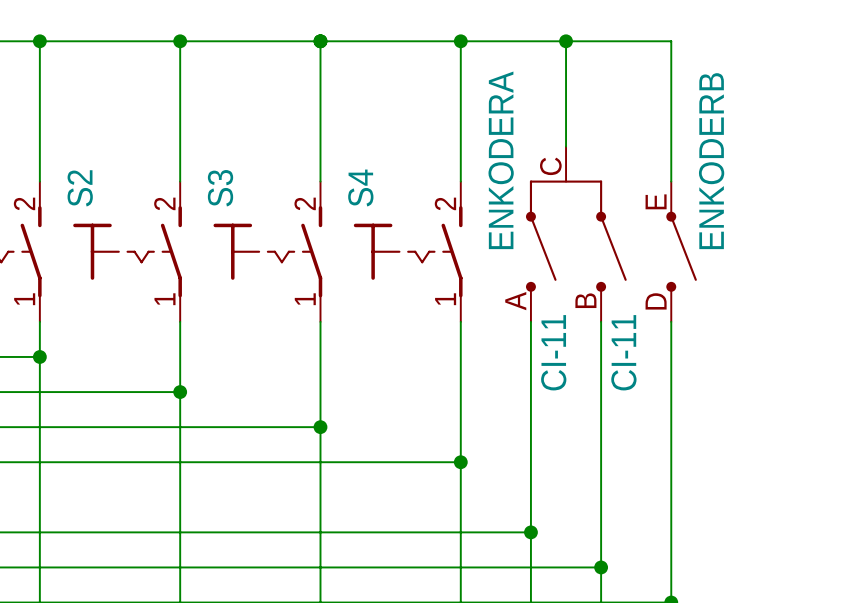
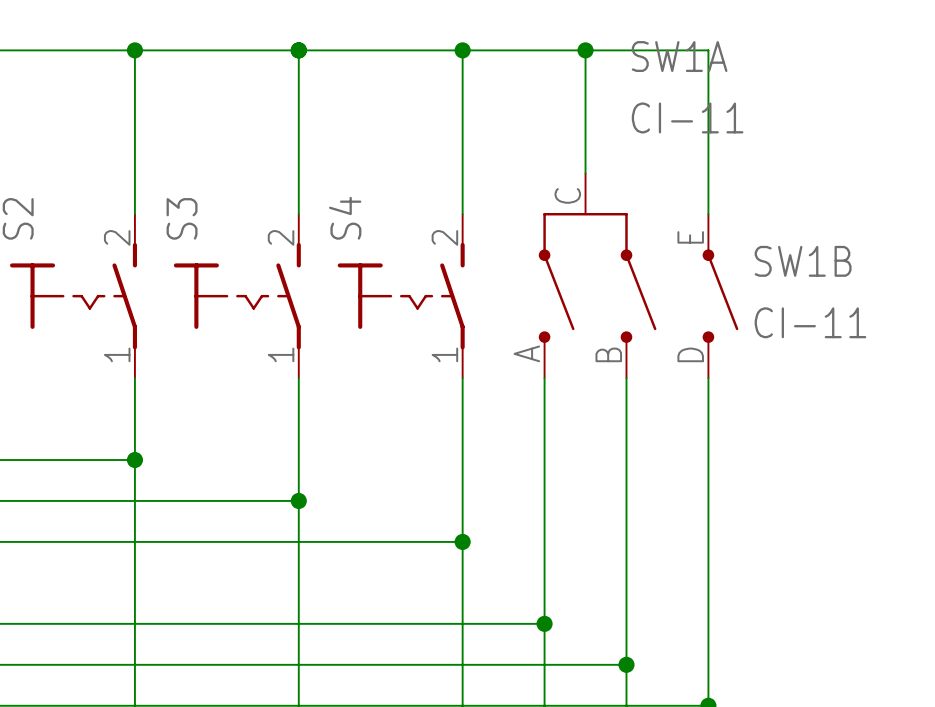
ENKODERA name: ENKODERA (501, 160) -> SW1A (679, 56)
ENKODERB name: ENKODERB (711, 161) -> SW1B (803, 261)
ENKODERA value rotation: 0° (553, 352) -> 90° clockwise (687, 117)
ENKODERA value position: CI-11 (553, 352) -> CI-11 (687, 117)
ENKODERB value rotation: 0° (623, 352) -> 90° clockwise (810, 322)
ENKODERB value position: CI-11 (623, 352) -> CI-11 (810, 322)

